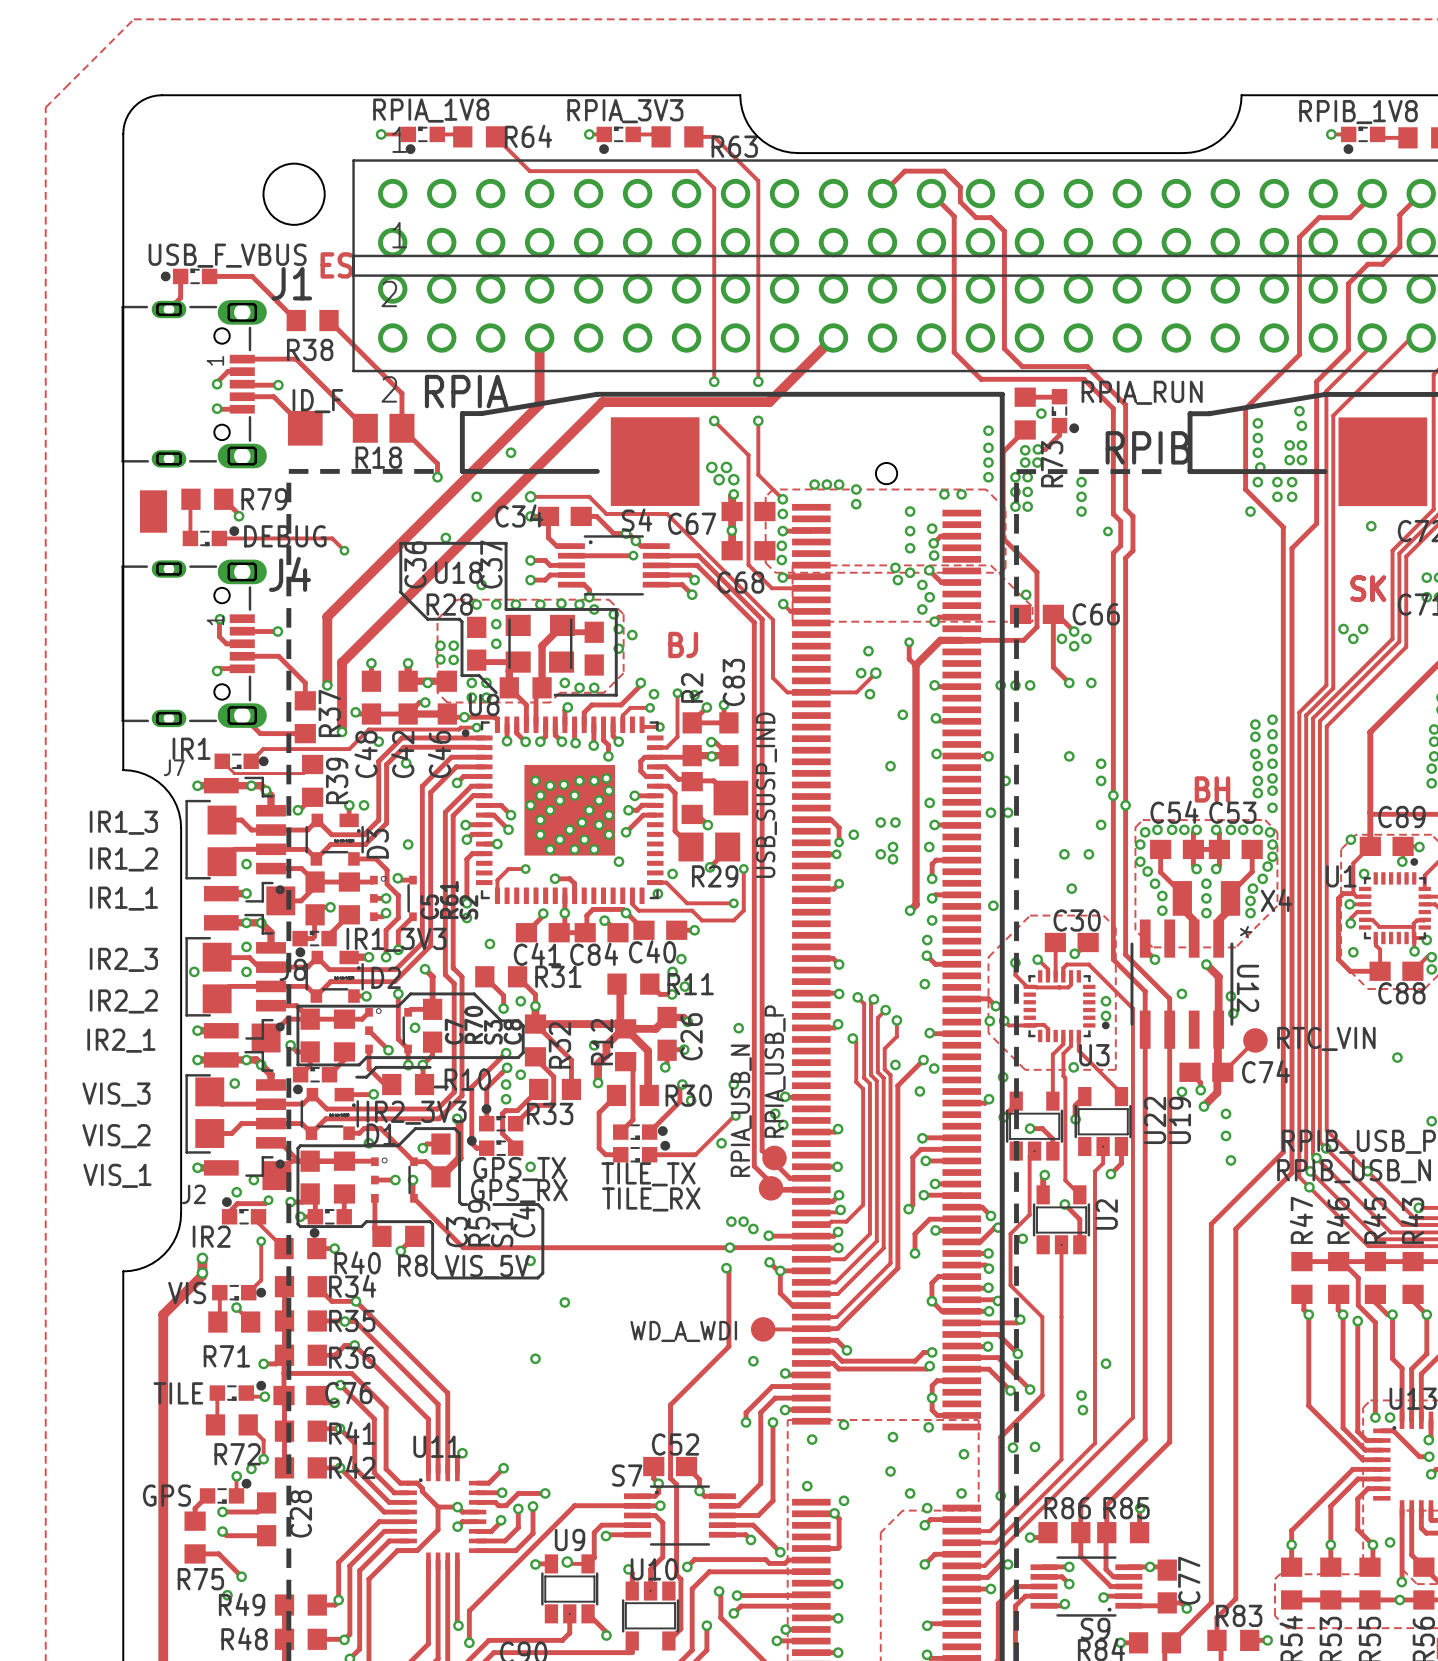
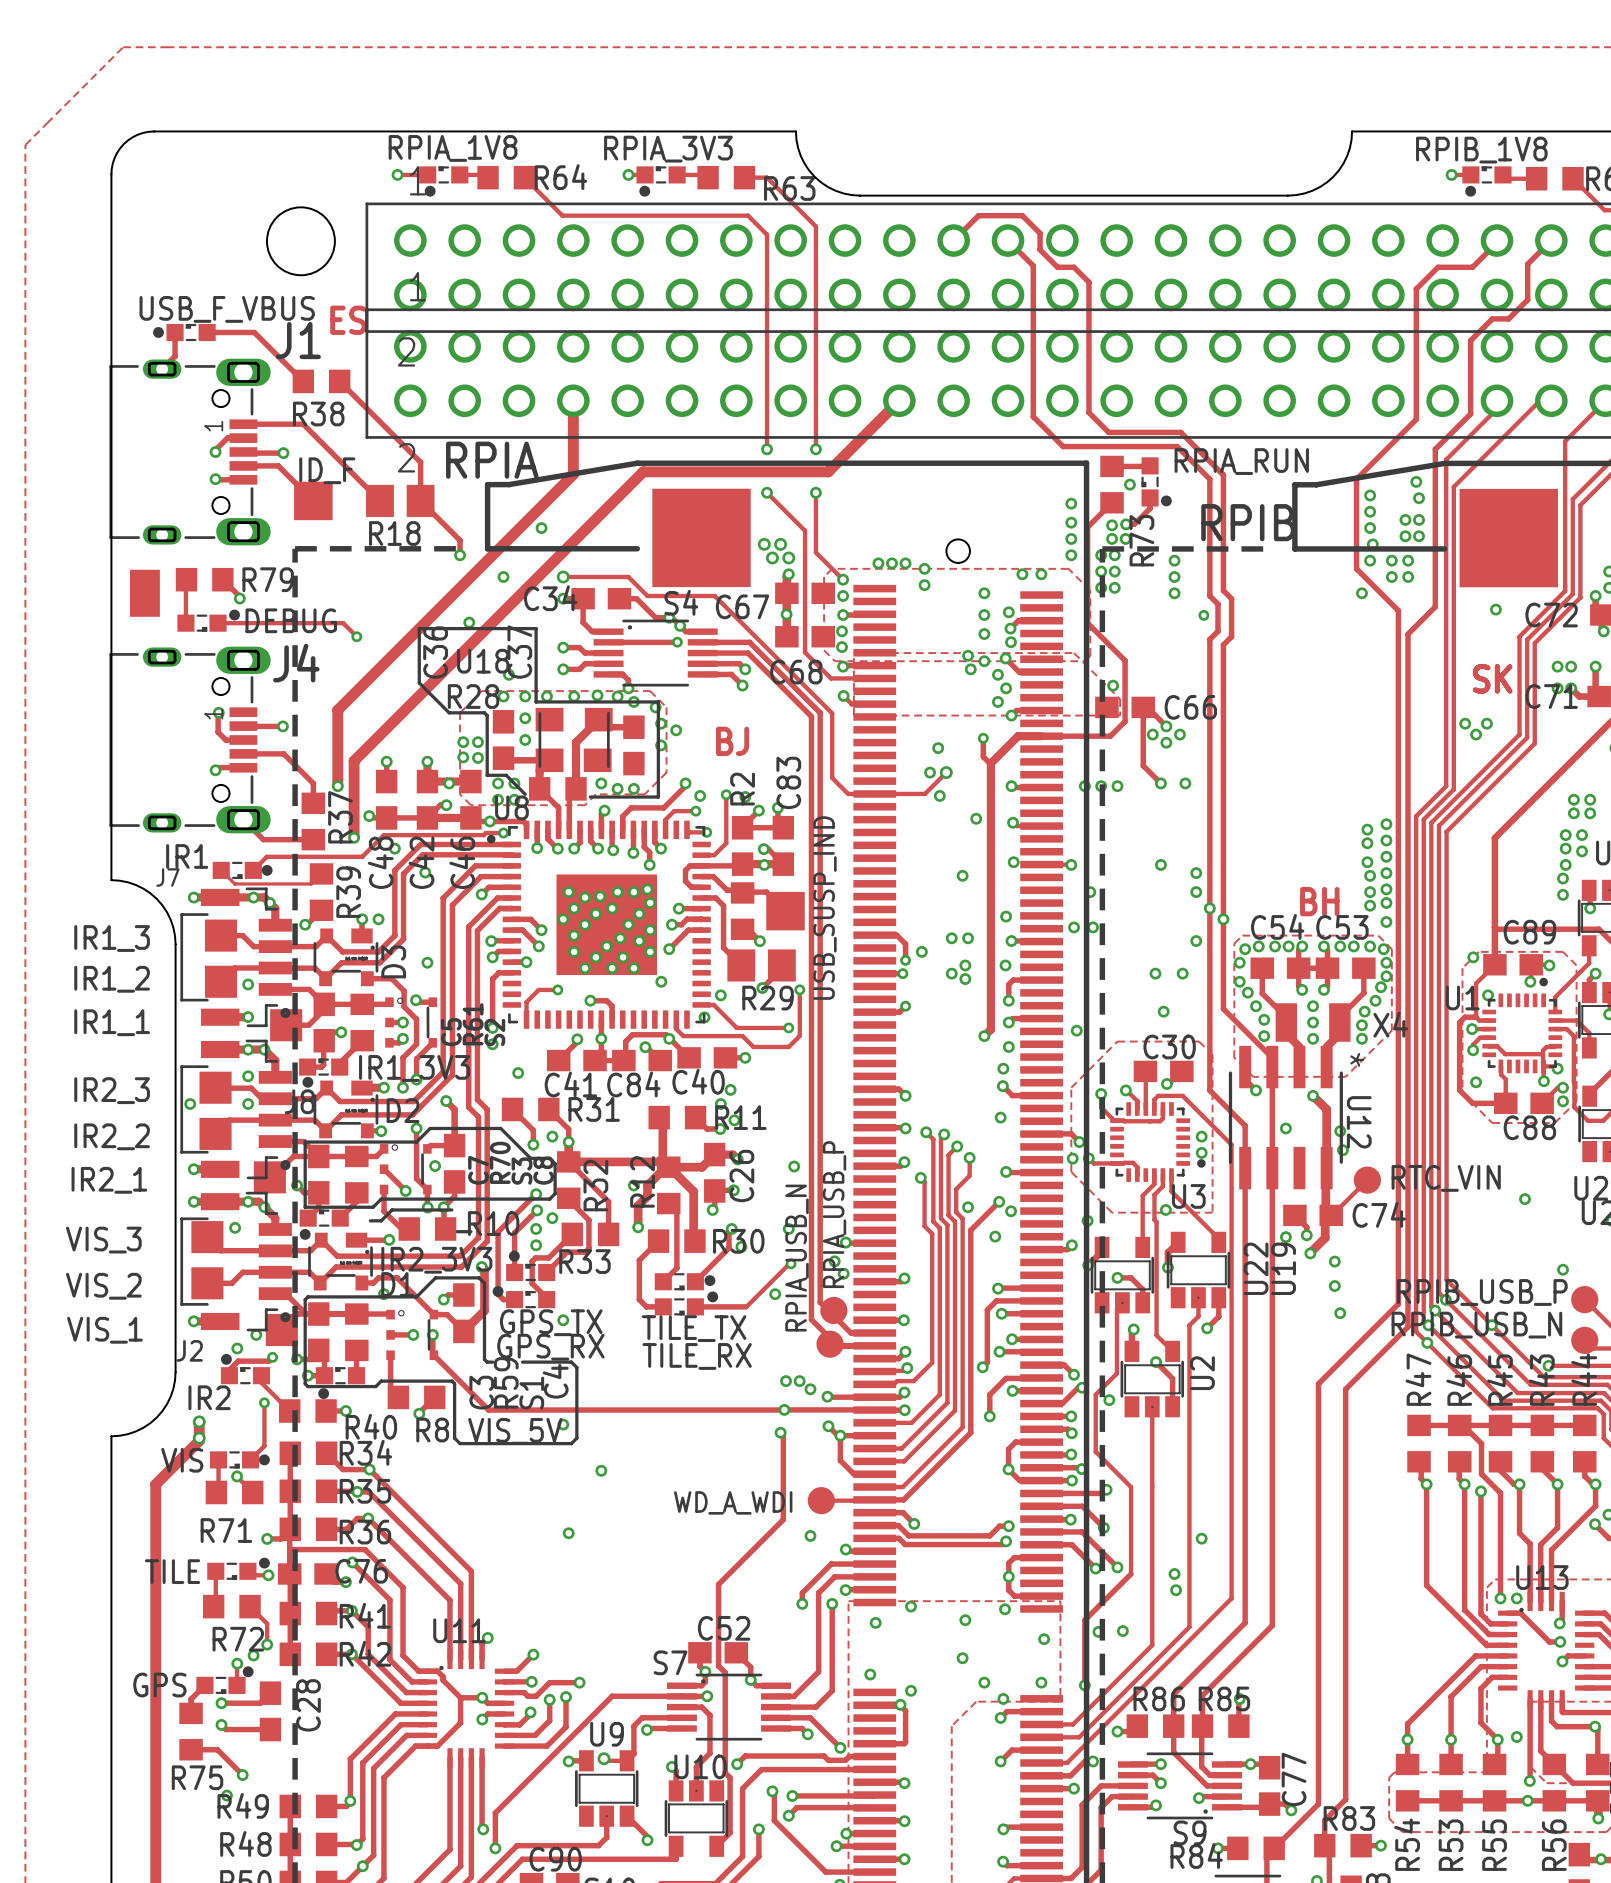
track: (1125, 886) (1125, 954) (1169, 998) -> (1223, 1008) (1272, 1057) (1272, 1133)

